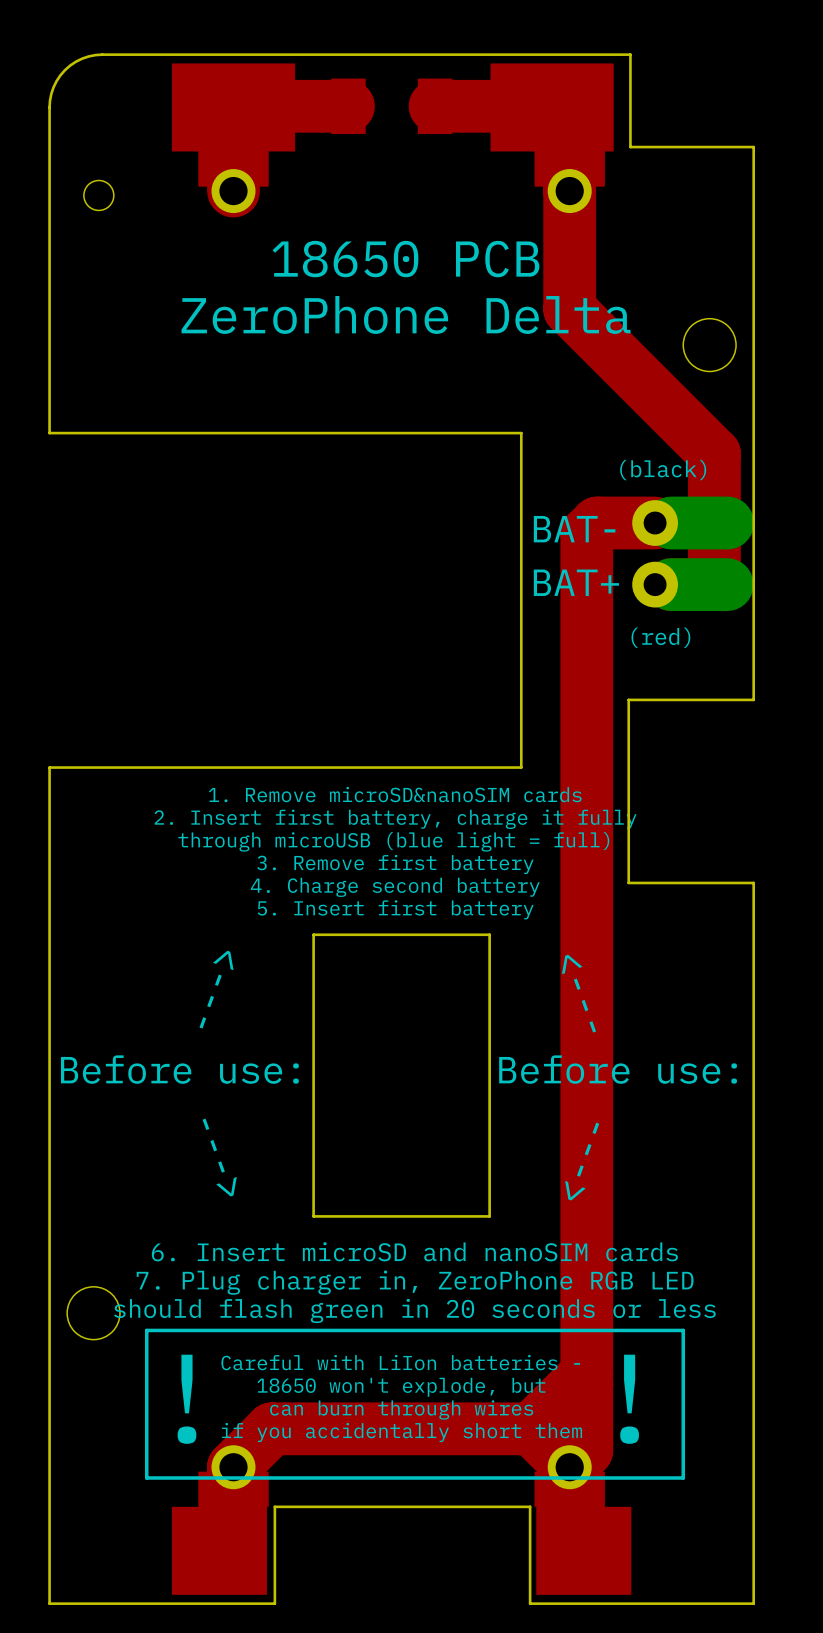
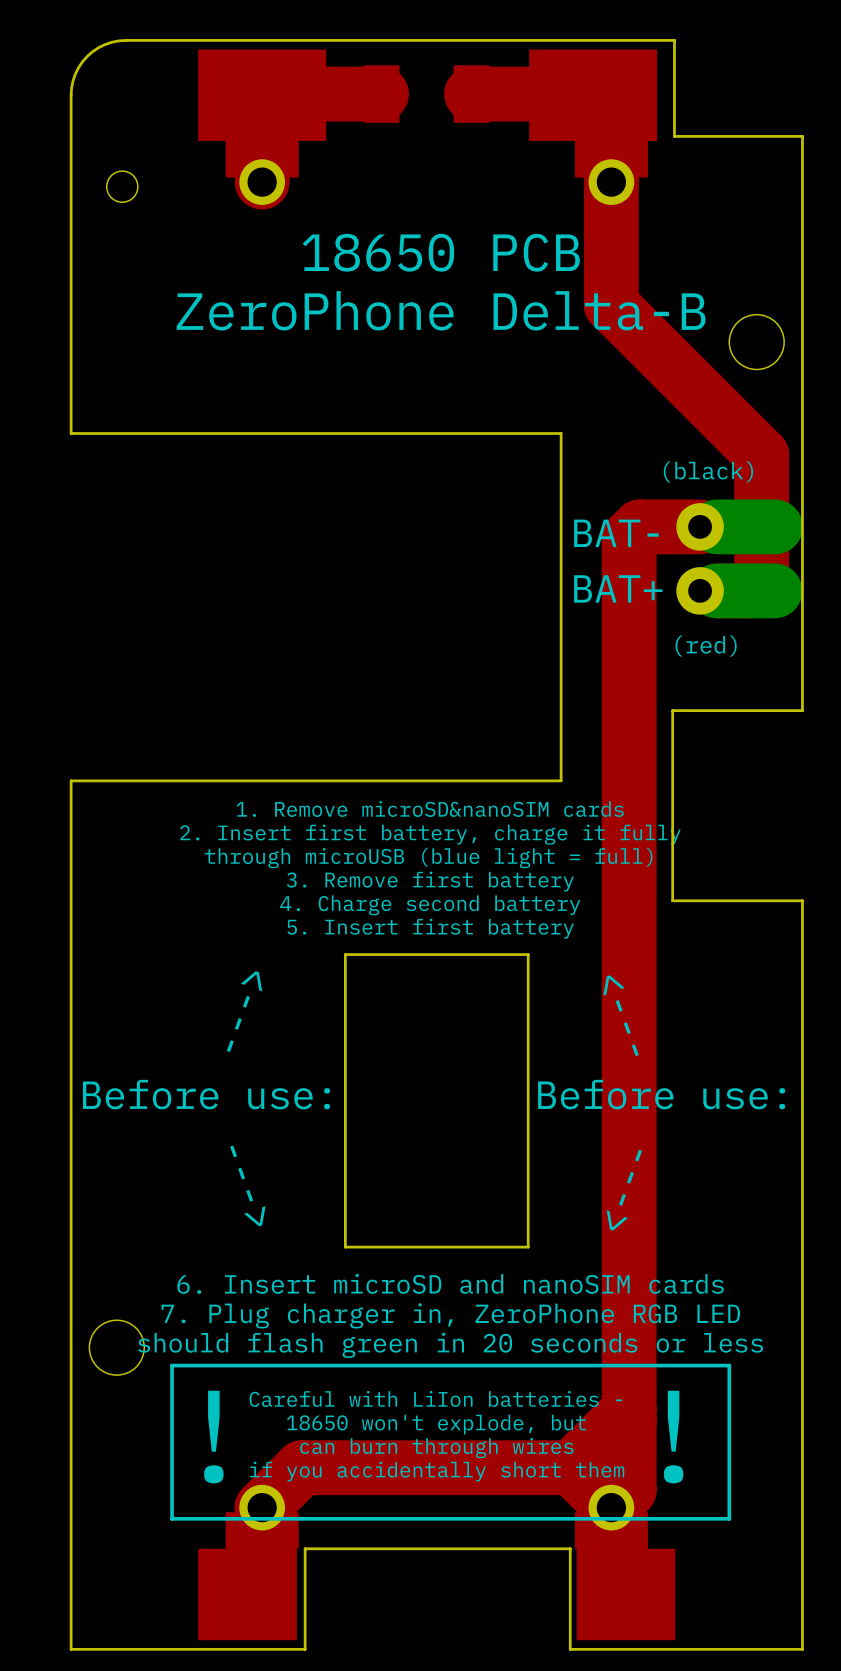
text: ZeroPhone Delta (406, 314) -> ZeroPhone Delta-B (441, 310)

